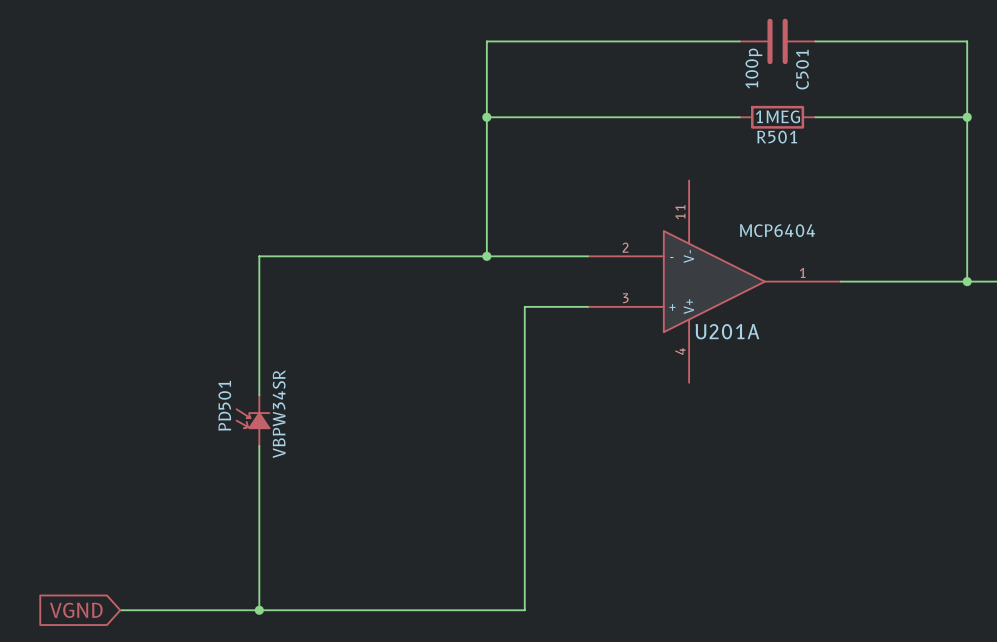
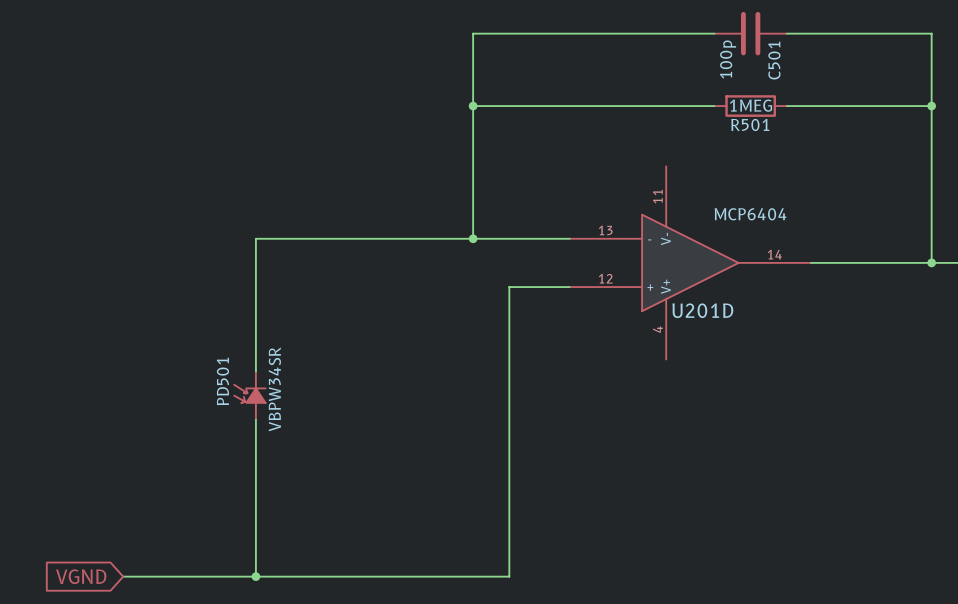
U201A pin number: 2 (625, 247) -> 13 (605, 230)
U201A pin number: 1 (802, 272) -> 14 (774, 254)
U201A pin number: 3 (625, 298) -> 12 (605, 278)
U201A name: U201A (727, 331) -> U201D (702, 310)

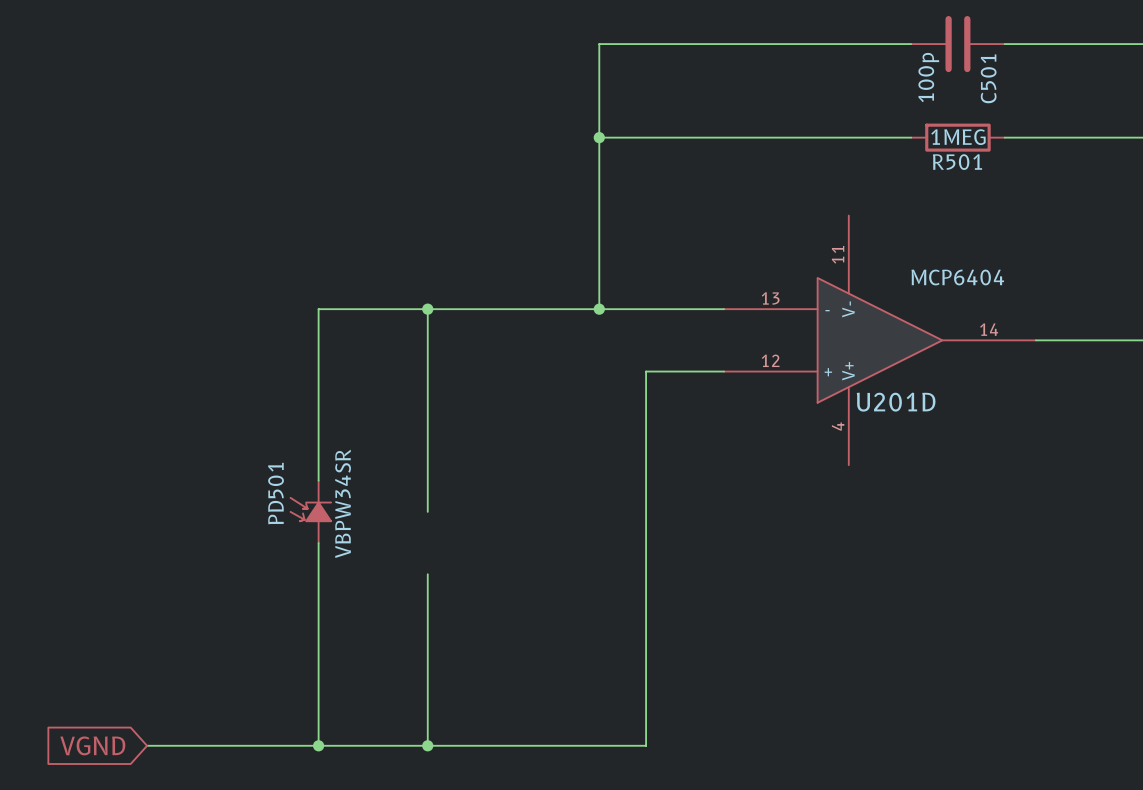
wire: none -> (427, 309) (427, 511)
junction: none -> (427, 309)
wire: none -> (427, 574) (427, 745)
junction: none -> (427, 745)

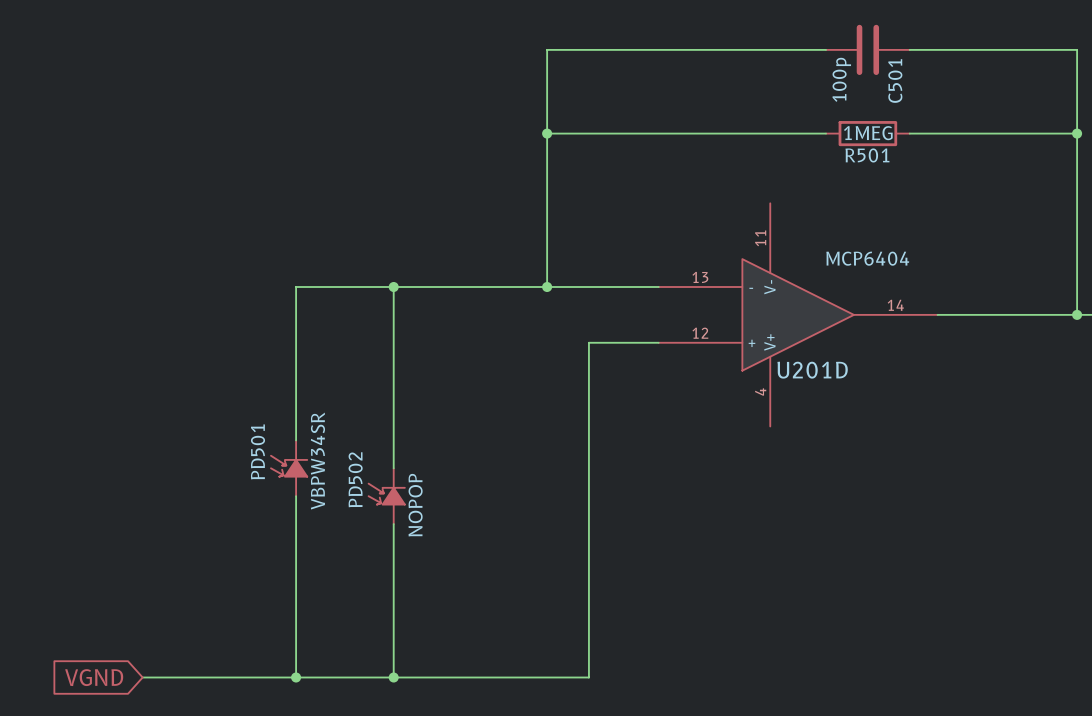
PD502: none -> NOPOP (386, 496)

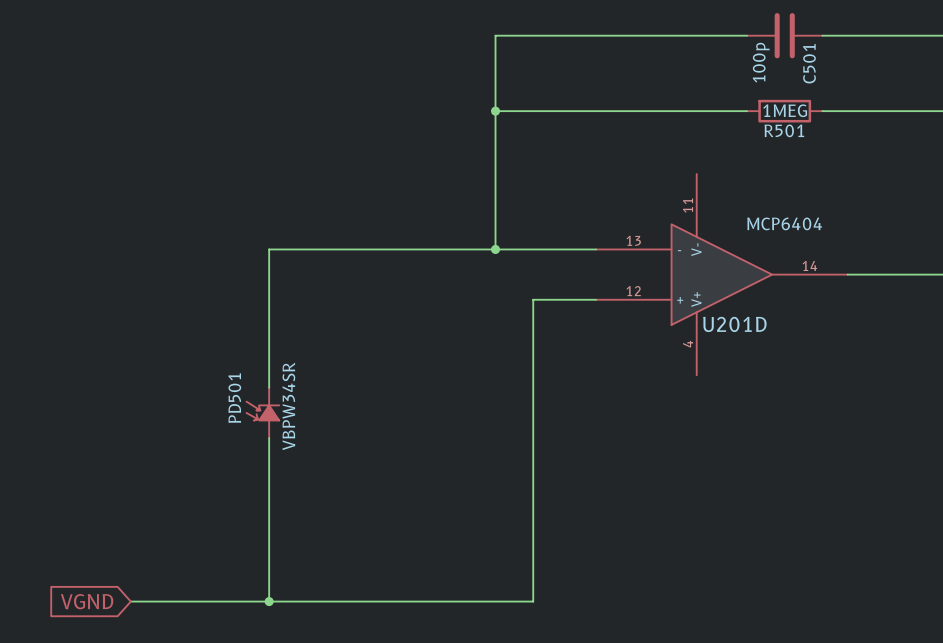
wire: (393, 287) (393, 468) -> none
junction: (393, 287) -> none
PD502: NOPOP (386, 496) -> none
wire: (393, 524) (393, 677) -> none
junction: (393, 677) -> none

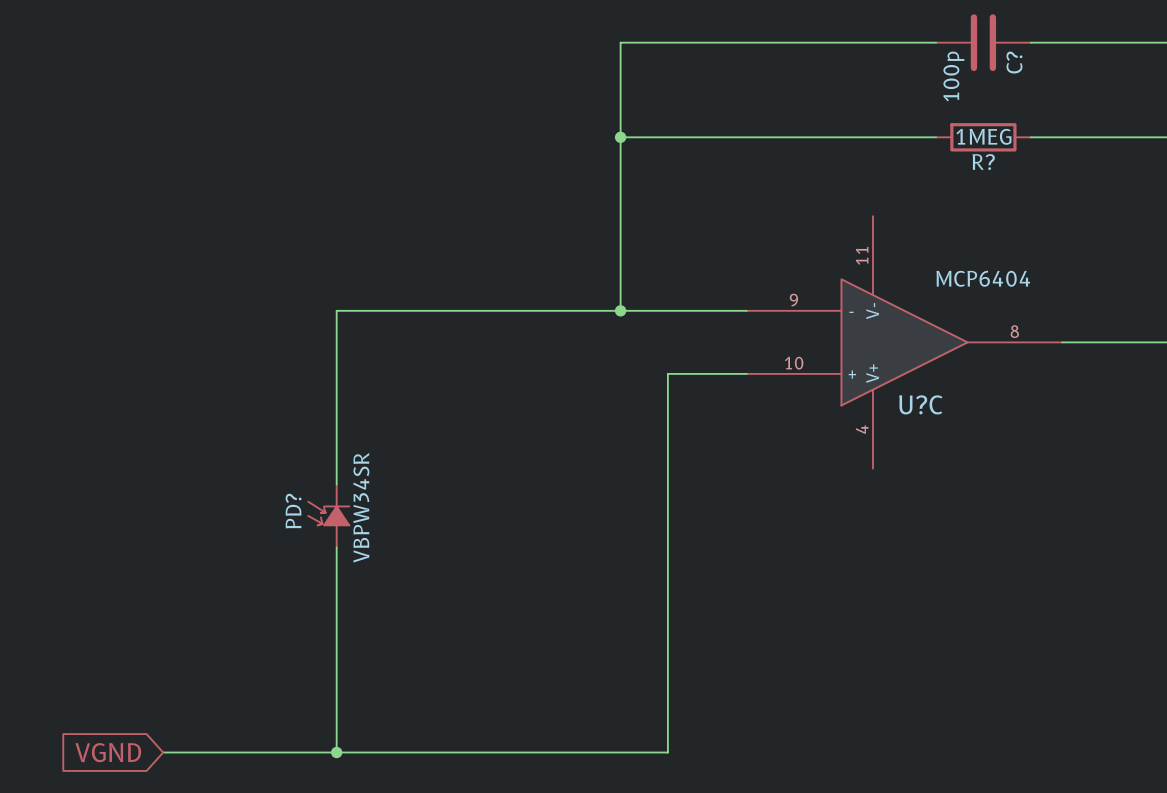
C501 name: C501 (809, 63) -> C? (1014, 62)
R501 name: R501 (784, 130) -> R? (983, 162)
U201D pin number: 13 (633, 240) -> 9 (793, 300)
U201D pin number: 14 (809, 265) -> 8 (1014, 331)
U201D pin number: 12 (633, 291) -> 10 (794, 363)
U201D name: U201D (734, 324) -> U?C (920, 404)
PD501 name: PD501 (234, 398) -> PD? (293, 511)

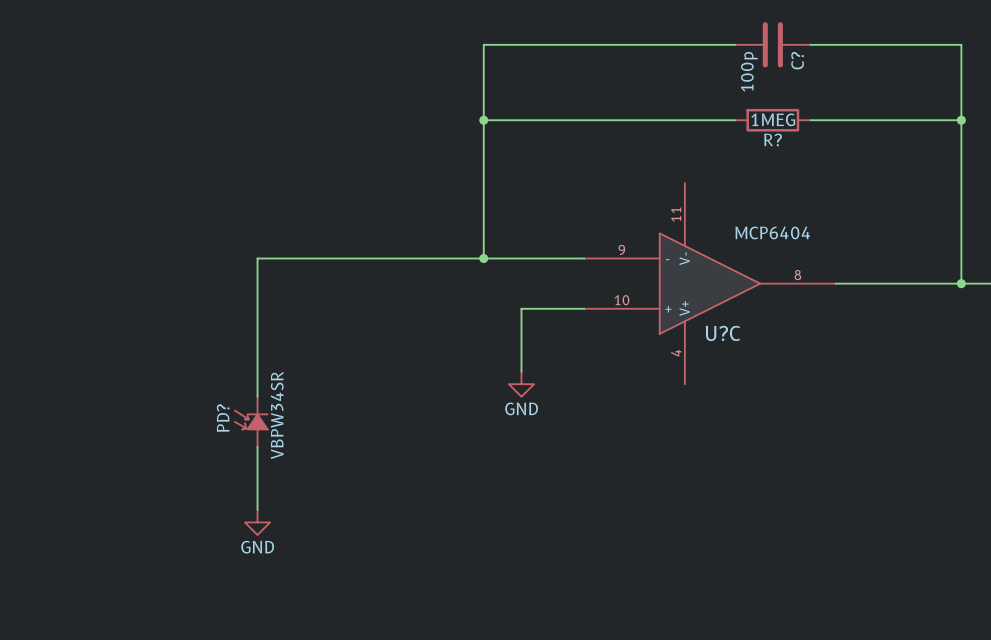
wire: (667, 452) (667, 752) (163, 752) -> none
power symbol: none -> GND (521, 384)
wire: (336, 626) (336, 752) -> none
power symbol: none -> GND (257, 522)
global label: VGND (108, 752) -> none
junction: (336, 752) -> none

